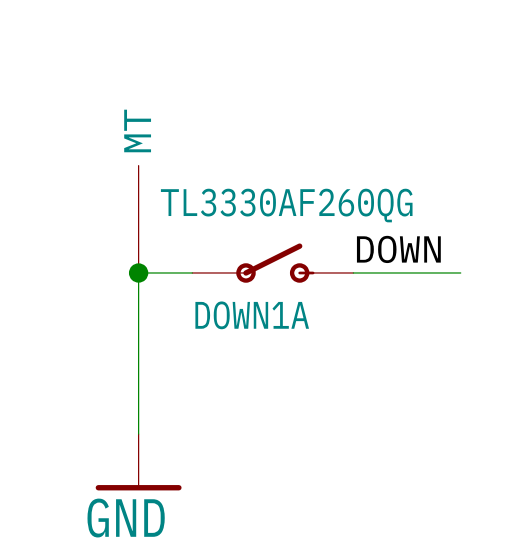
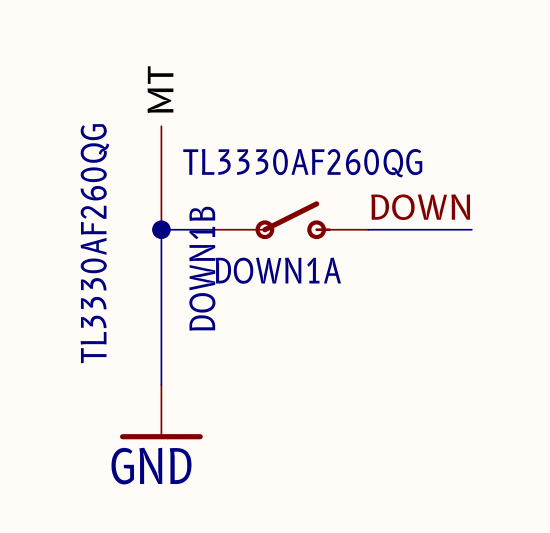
DOWN1B value: none -> TL3330AF260QG (94, 243)
DOWN1B name: none -> DOWN1B (202, 268)

